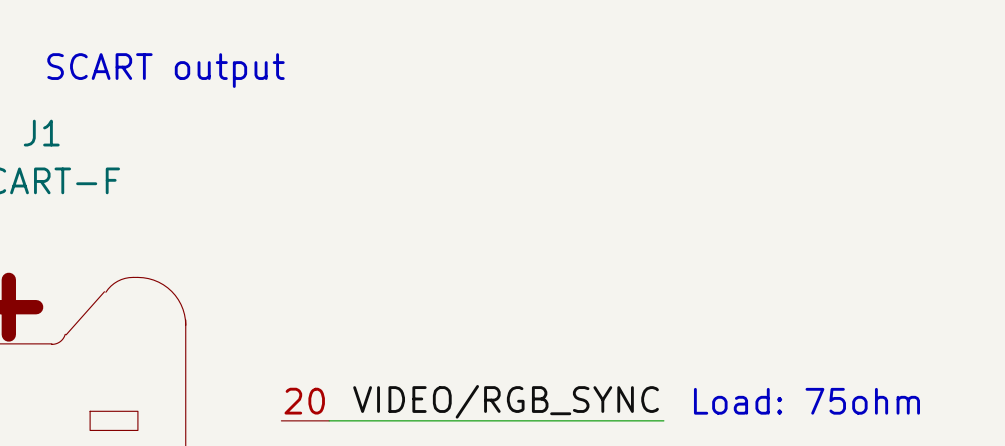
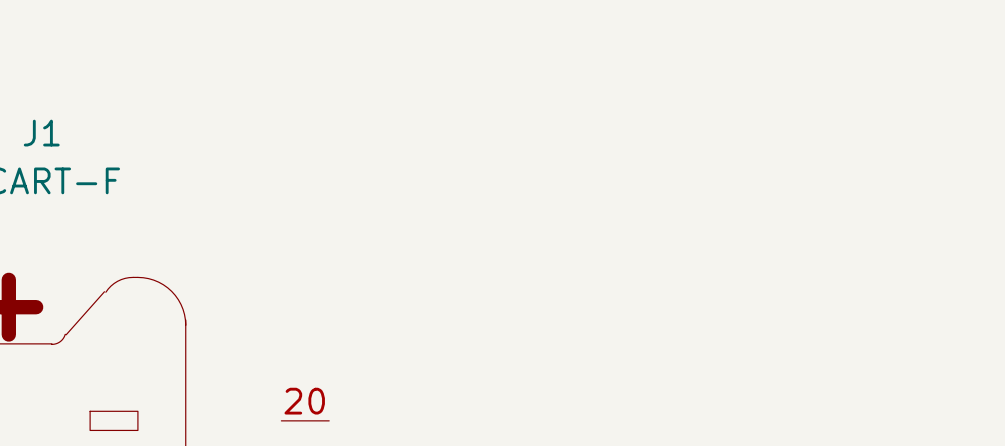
text: SCART output (165, 70) -> none
label: VIDEO/RGB_SYNC (506, 401) -> none
text: Load: 75ohm (806, 401) -> none
wire: (329, 420) (663, 420) -> none

